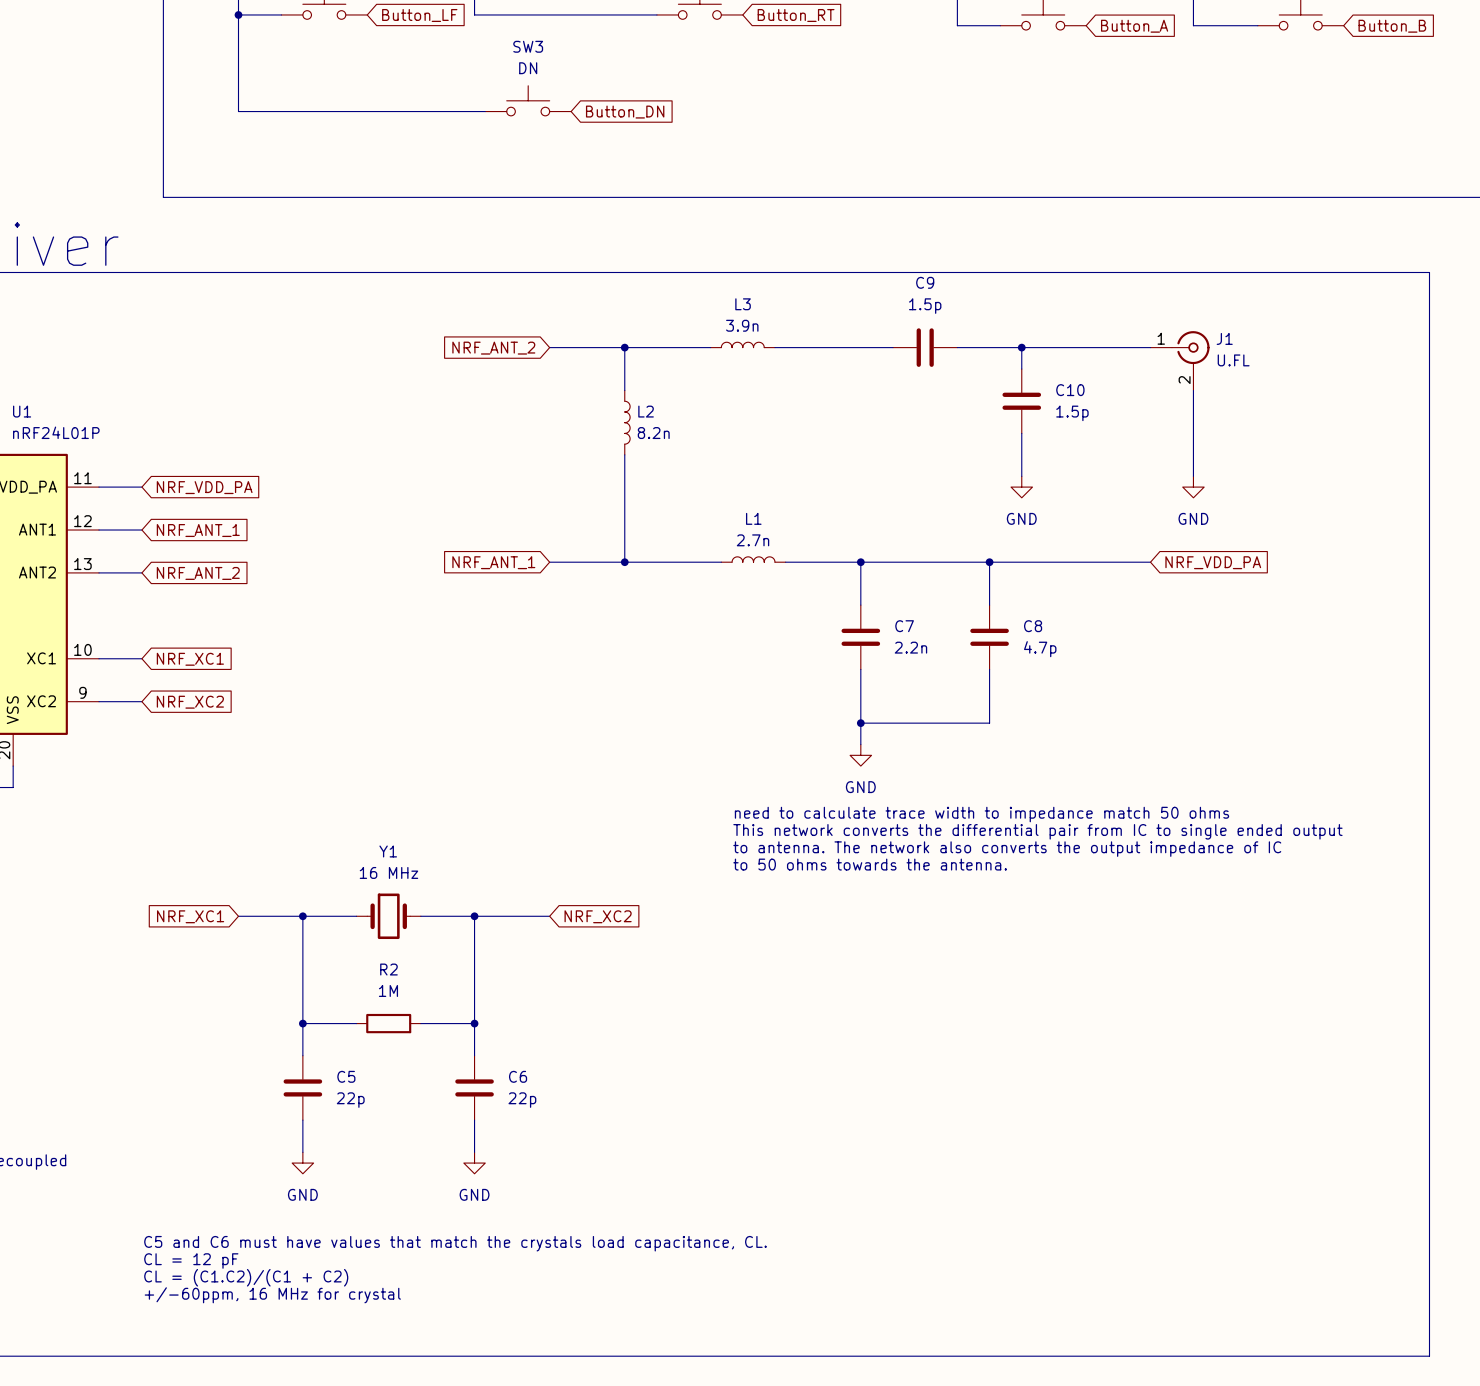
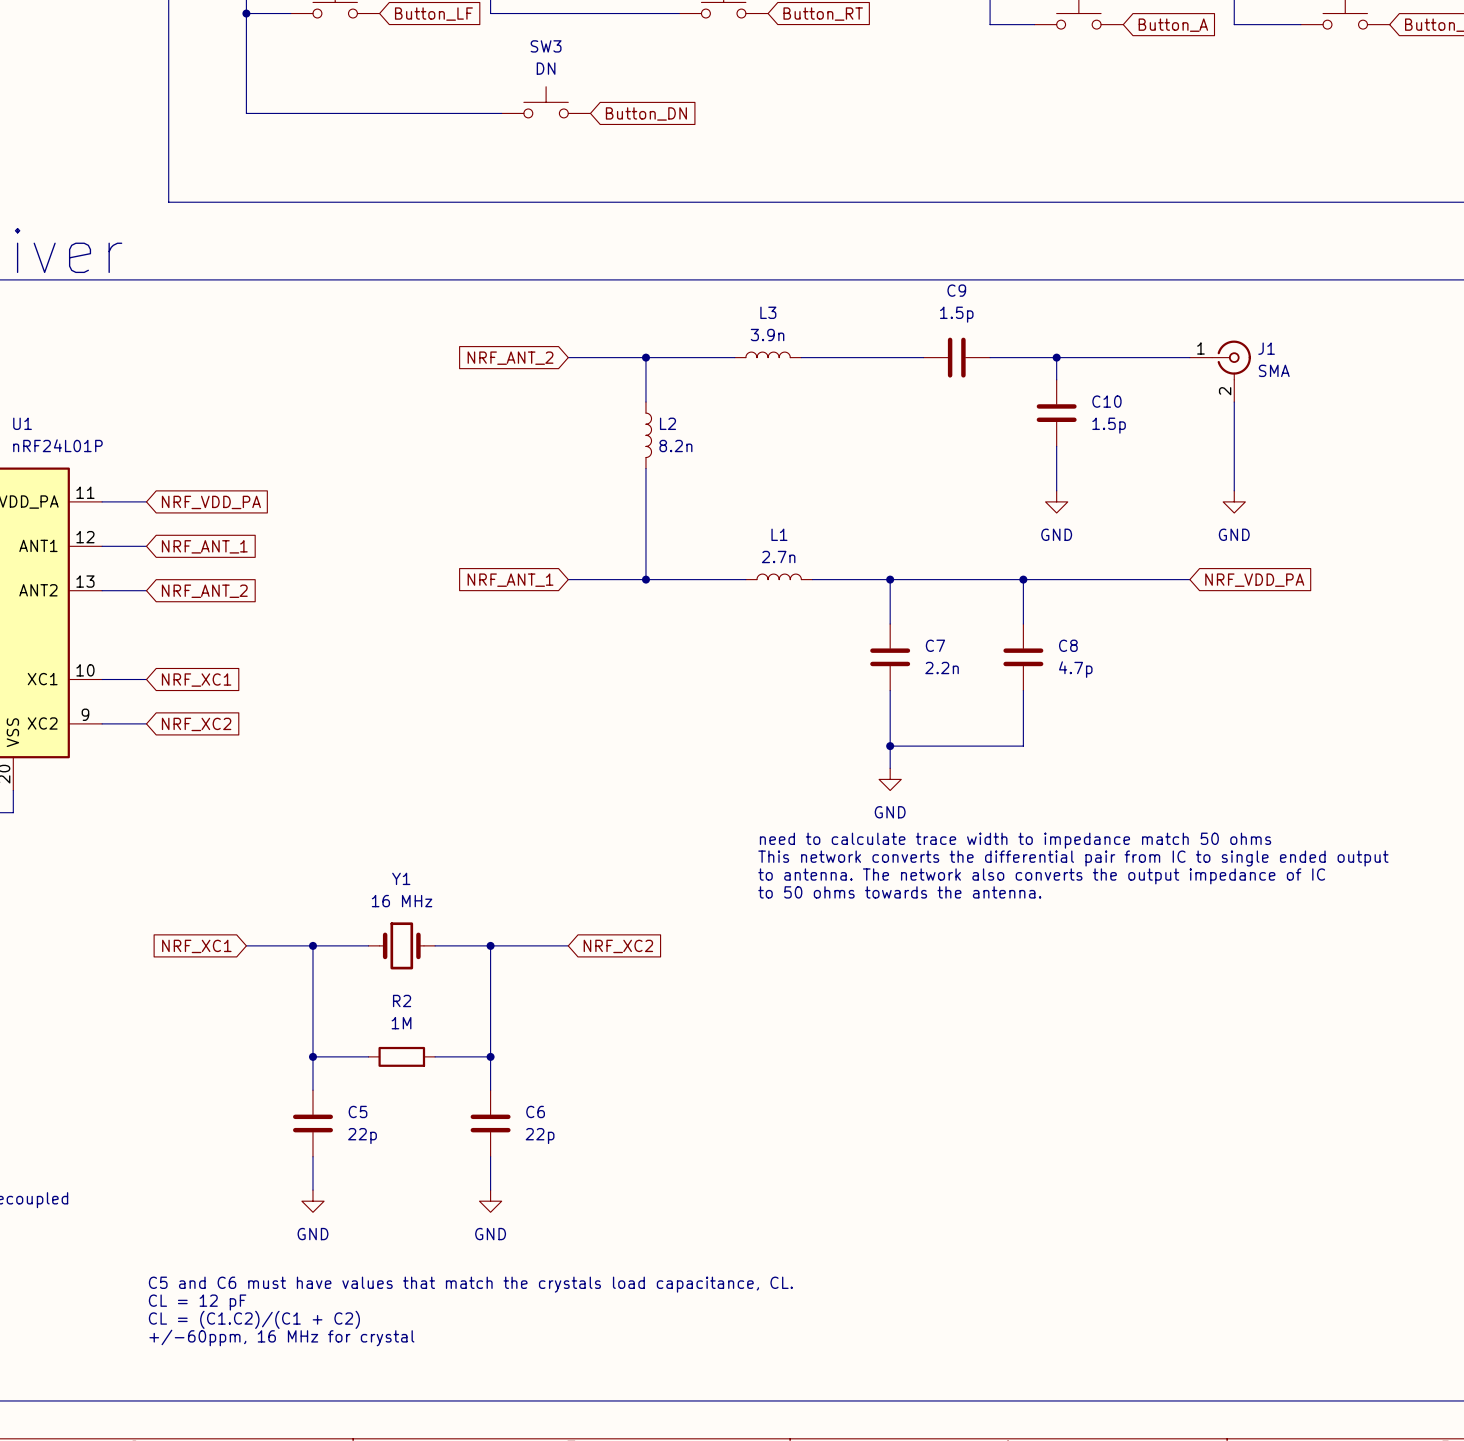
J1 value: U.FL (1233, 360) -> SMA (1274, 370)

